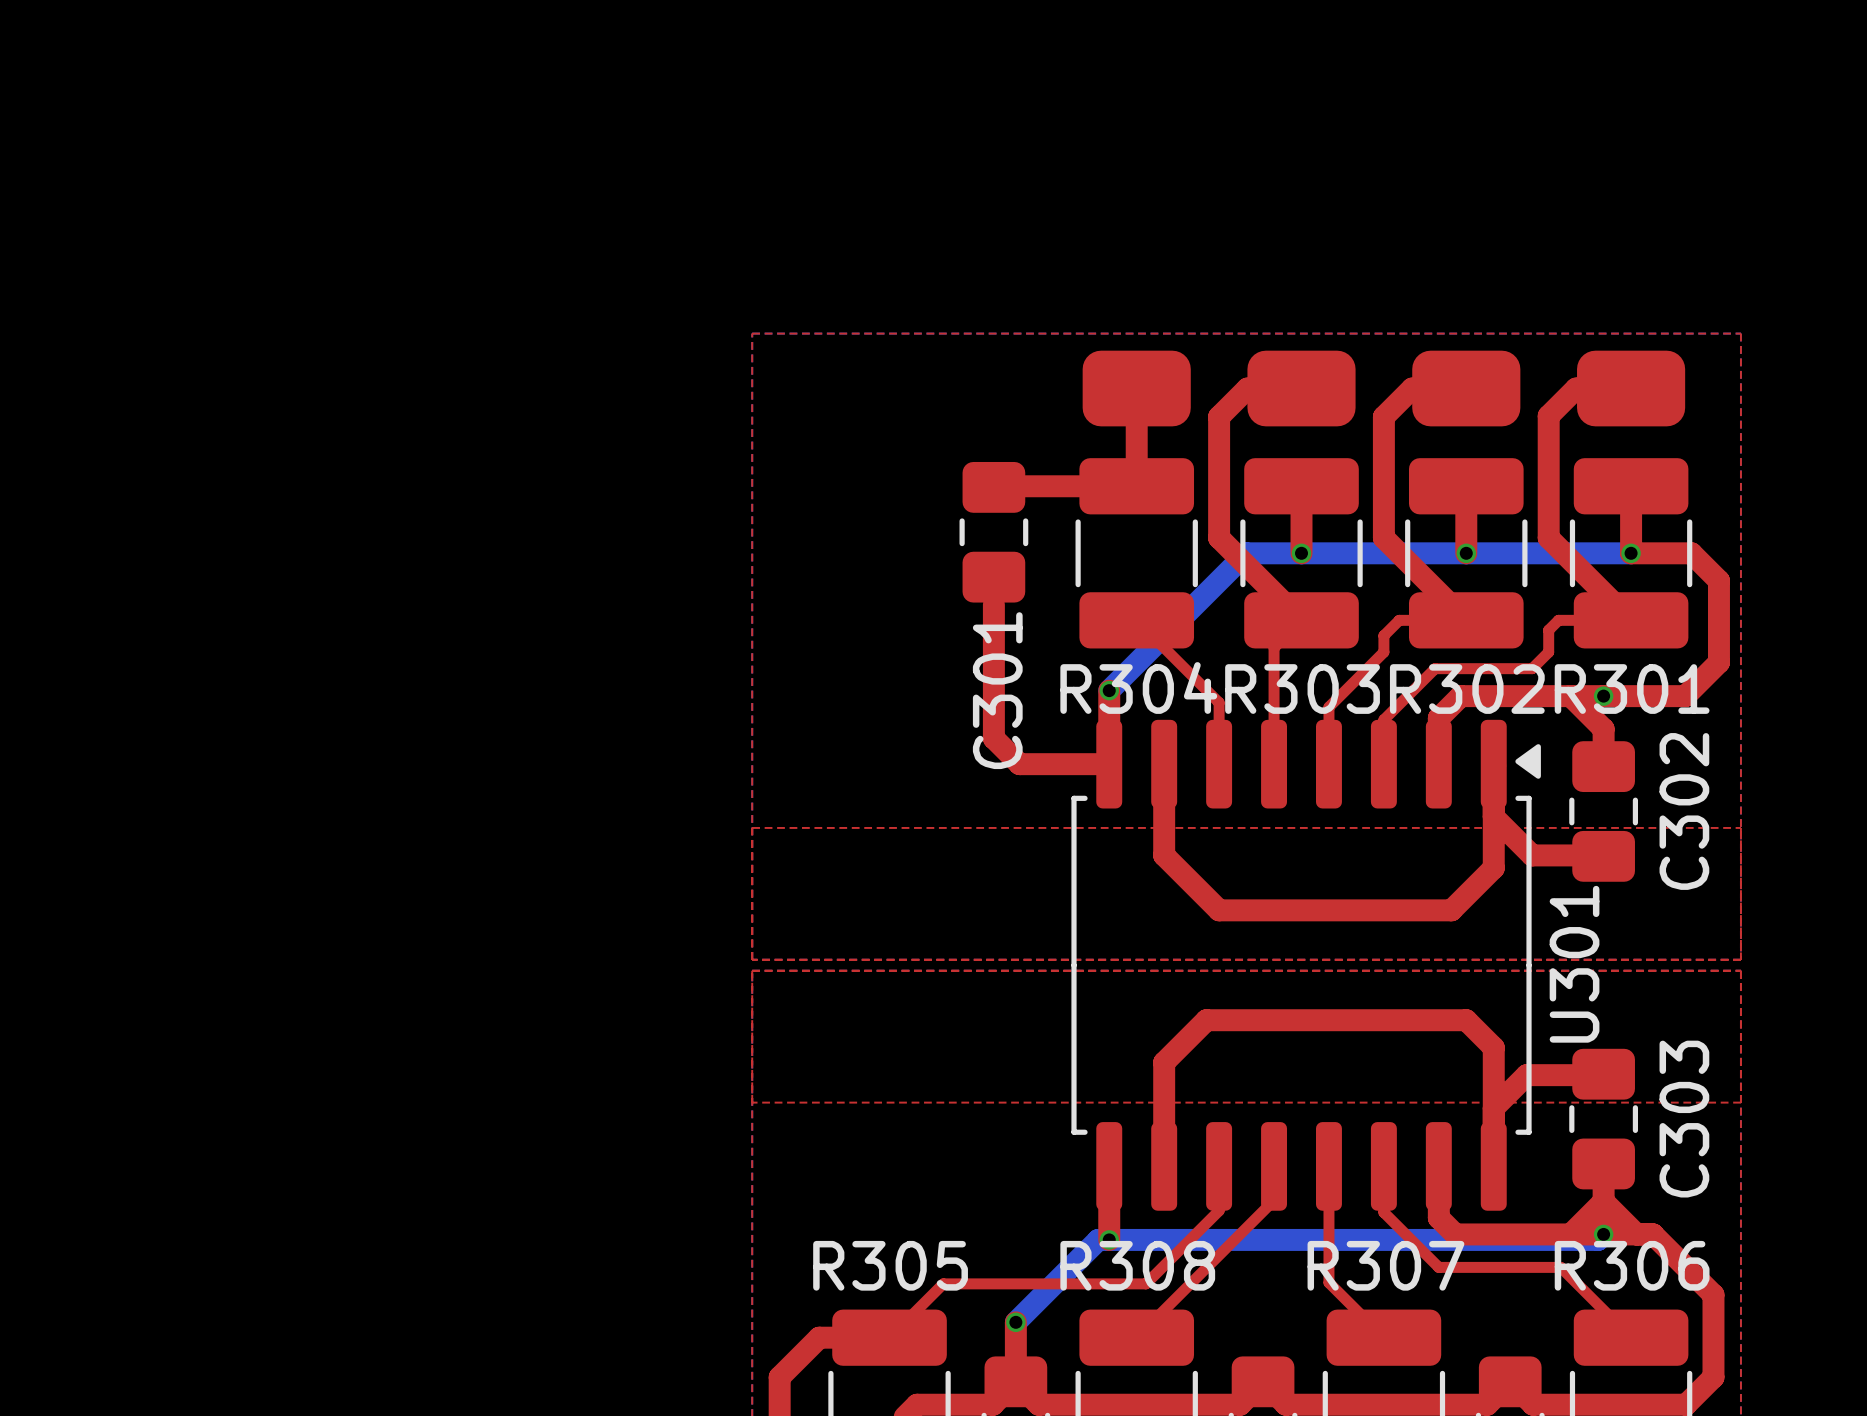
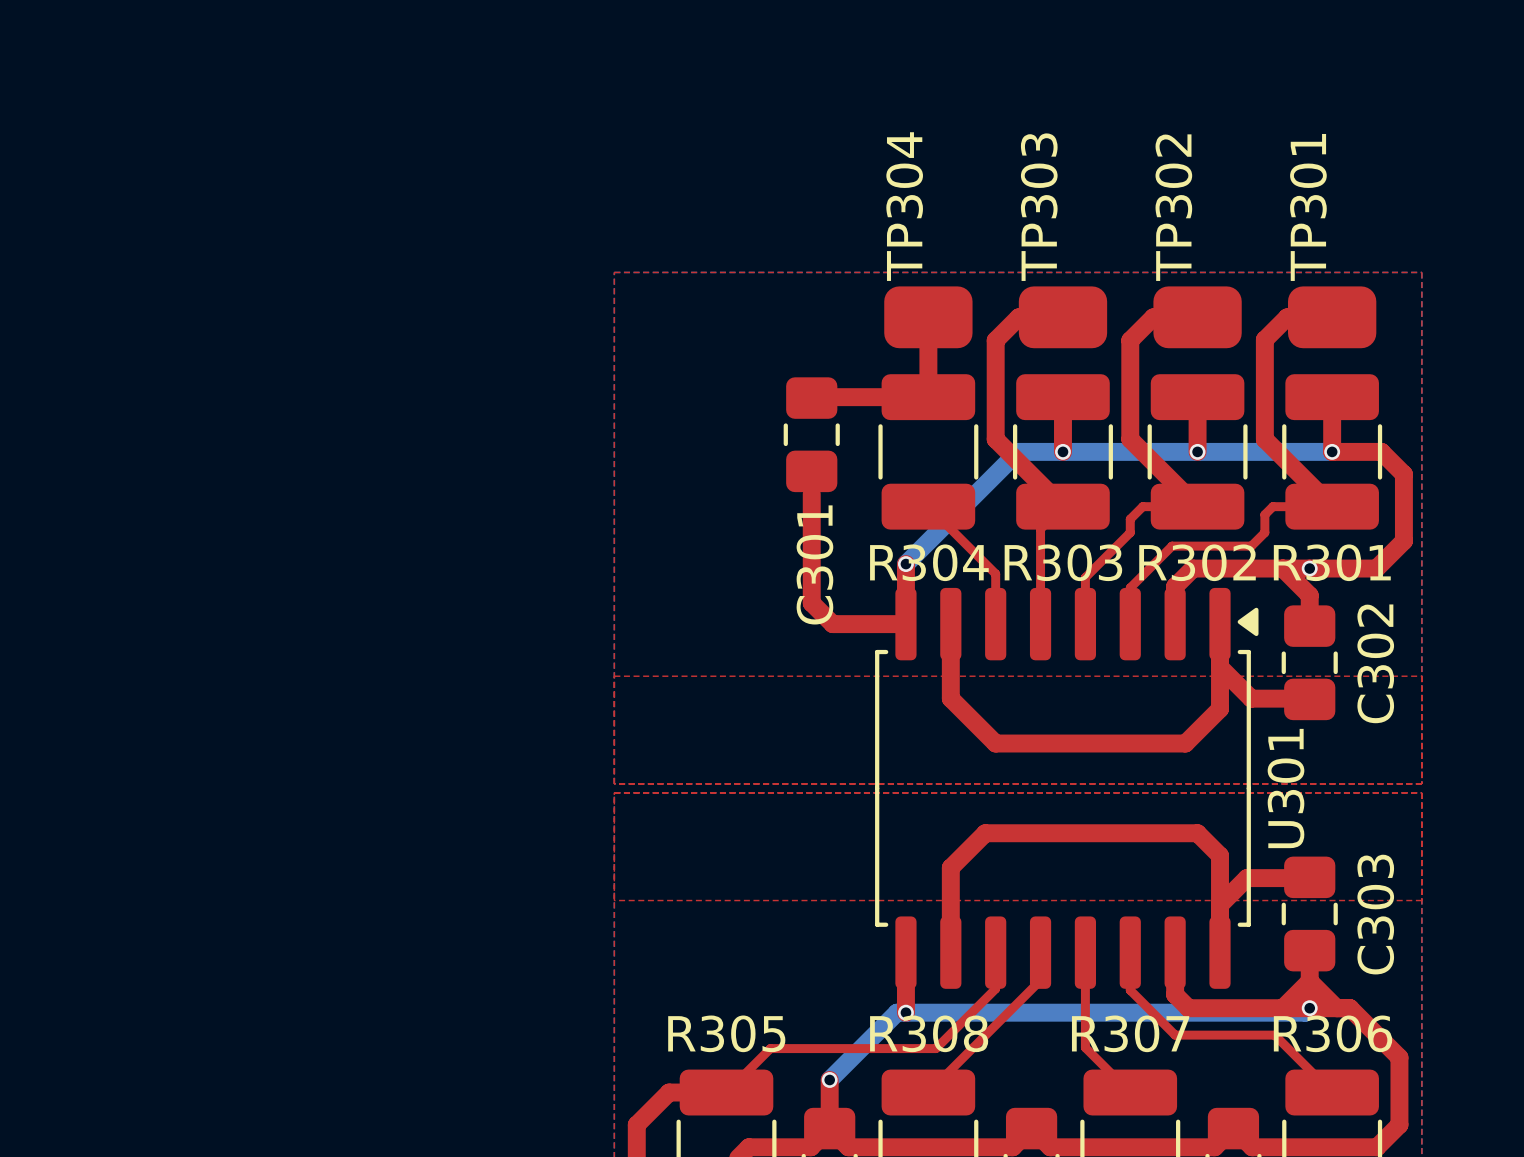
TP304 name: none -> TP304 (904, 206)
TP303 name: none -> TP303 (1039, 207)
TP302 name: none -> TP302 (1173, 207)
TP301 name: none -> TP301 (1308, 207)

